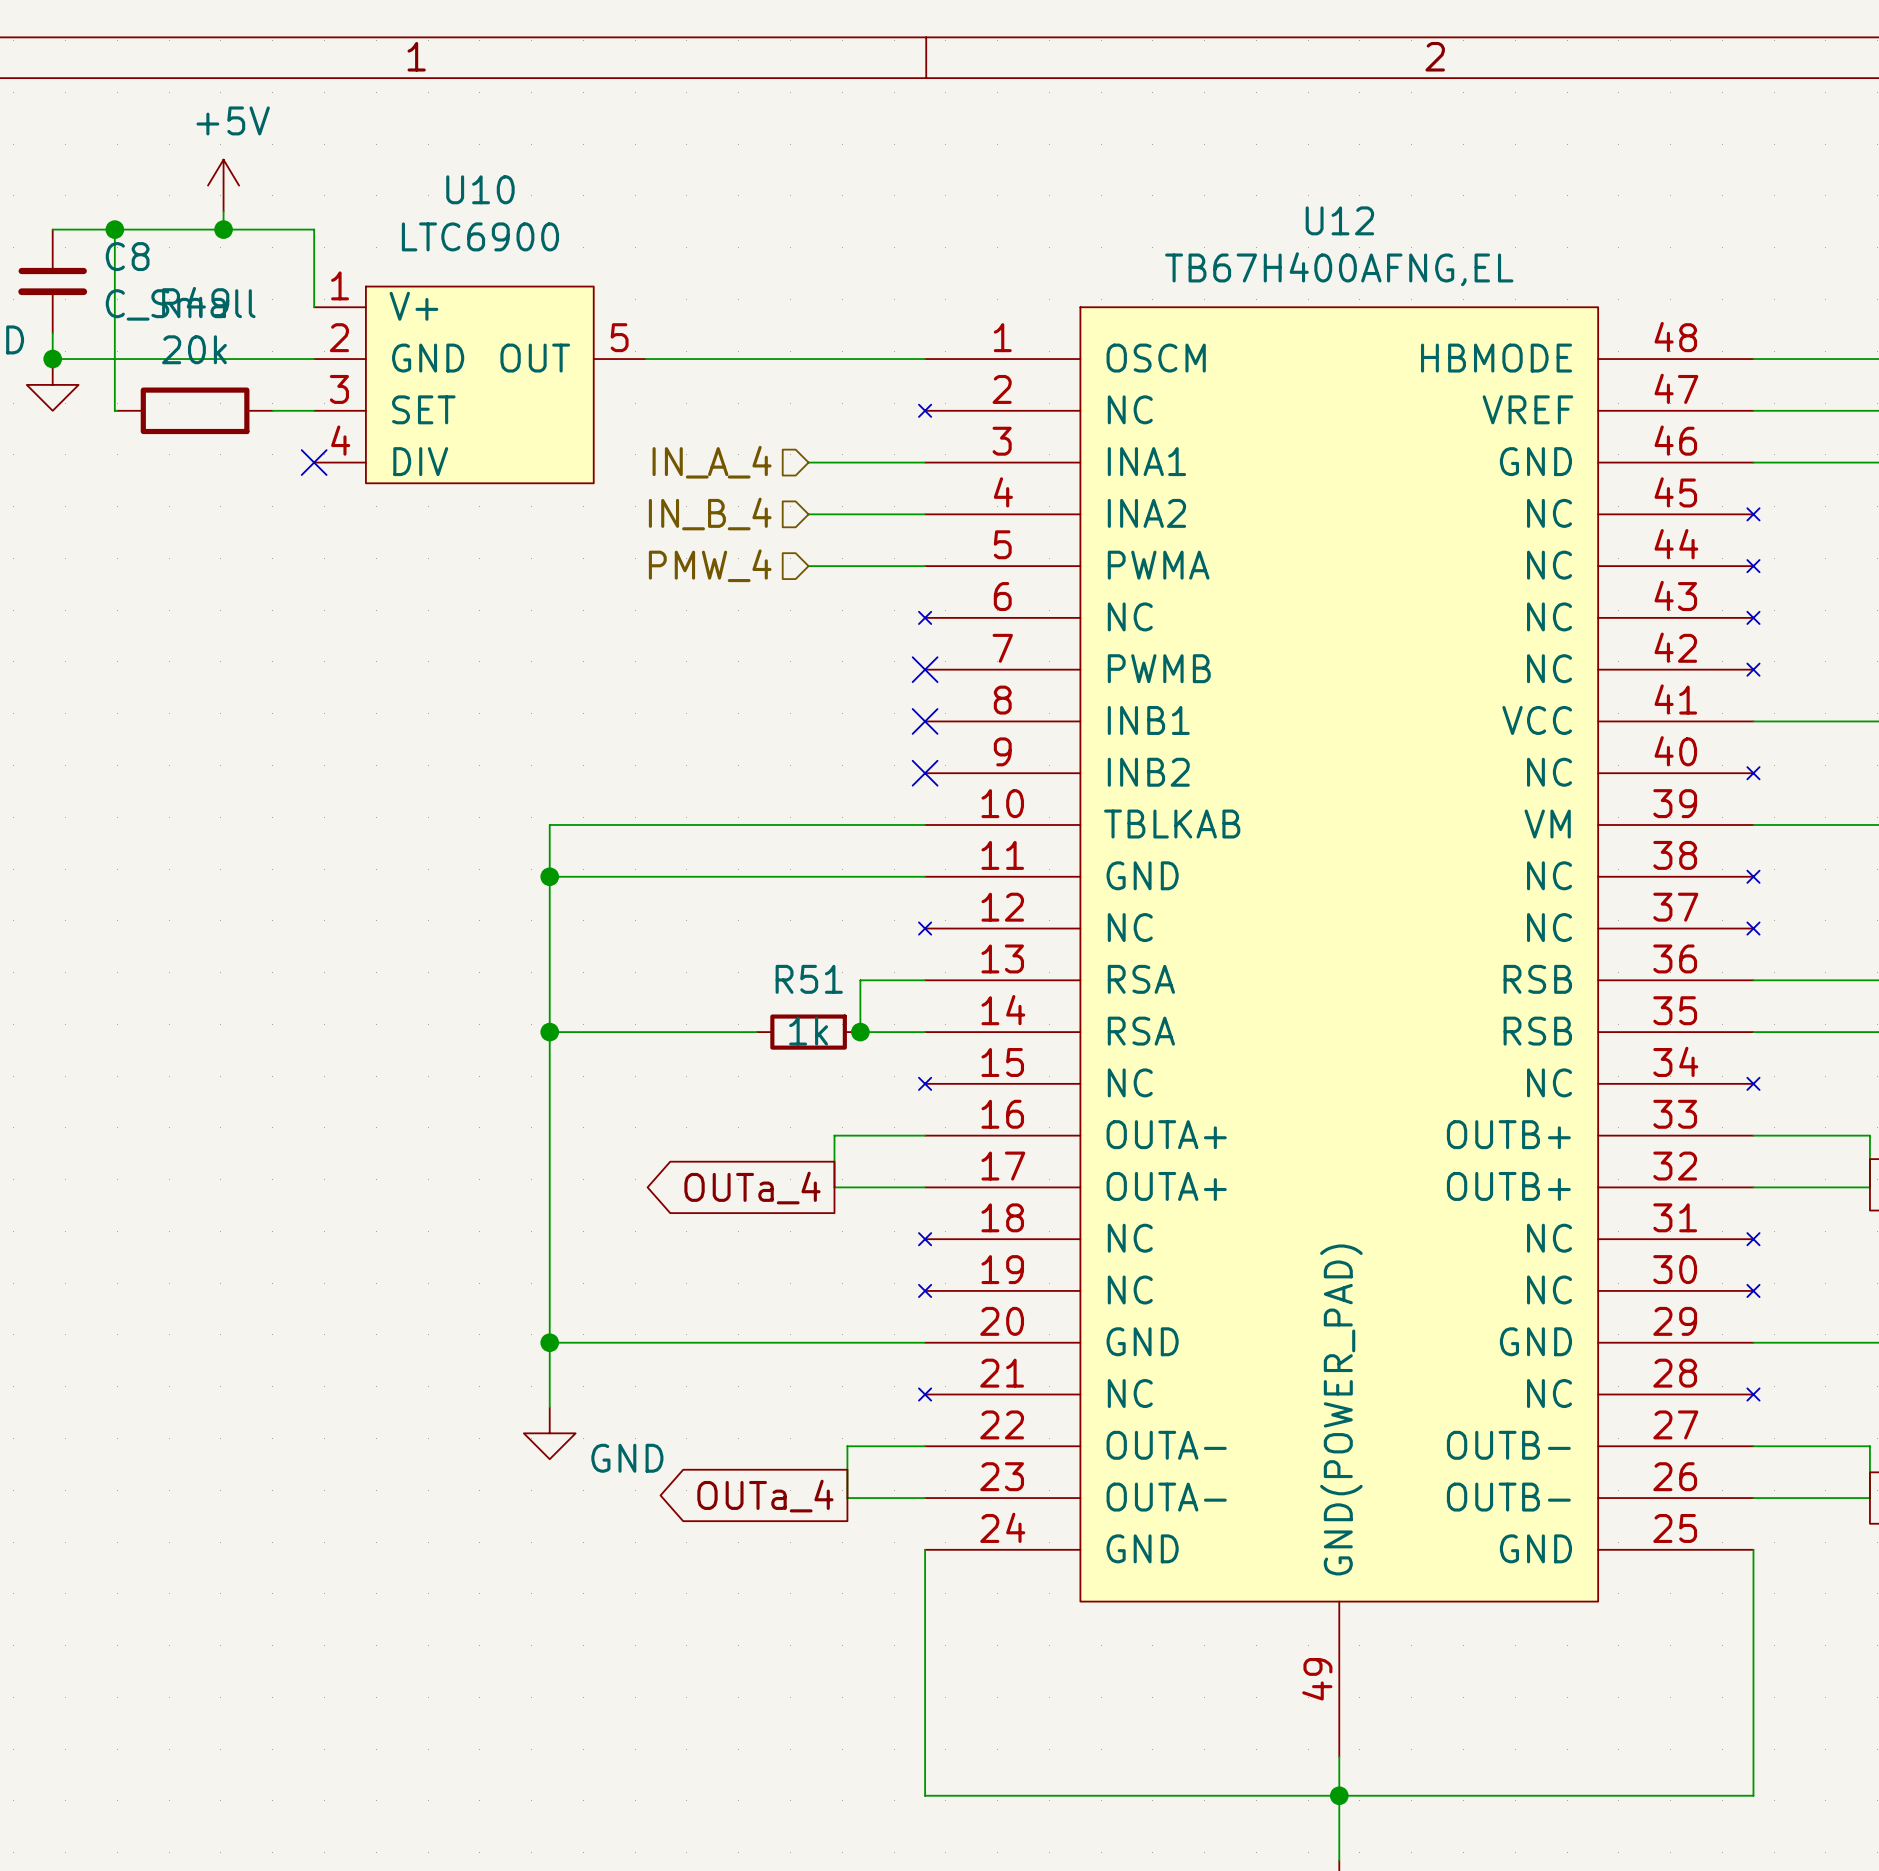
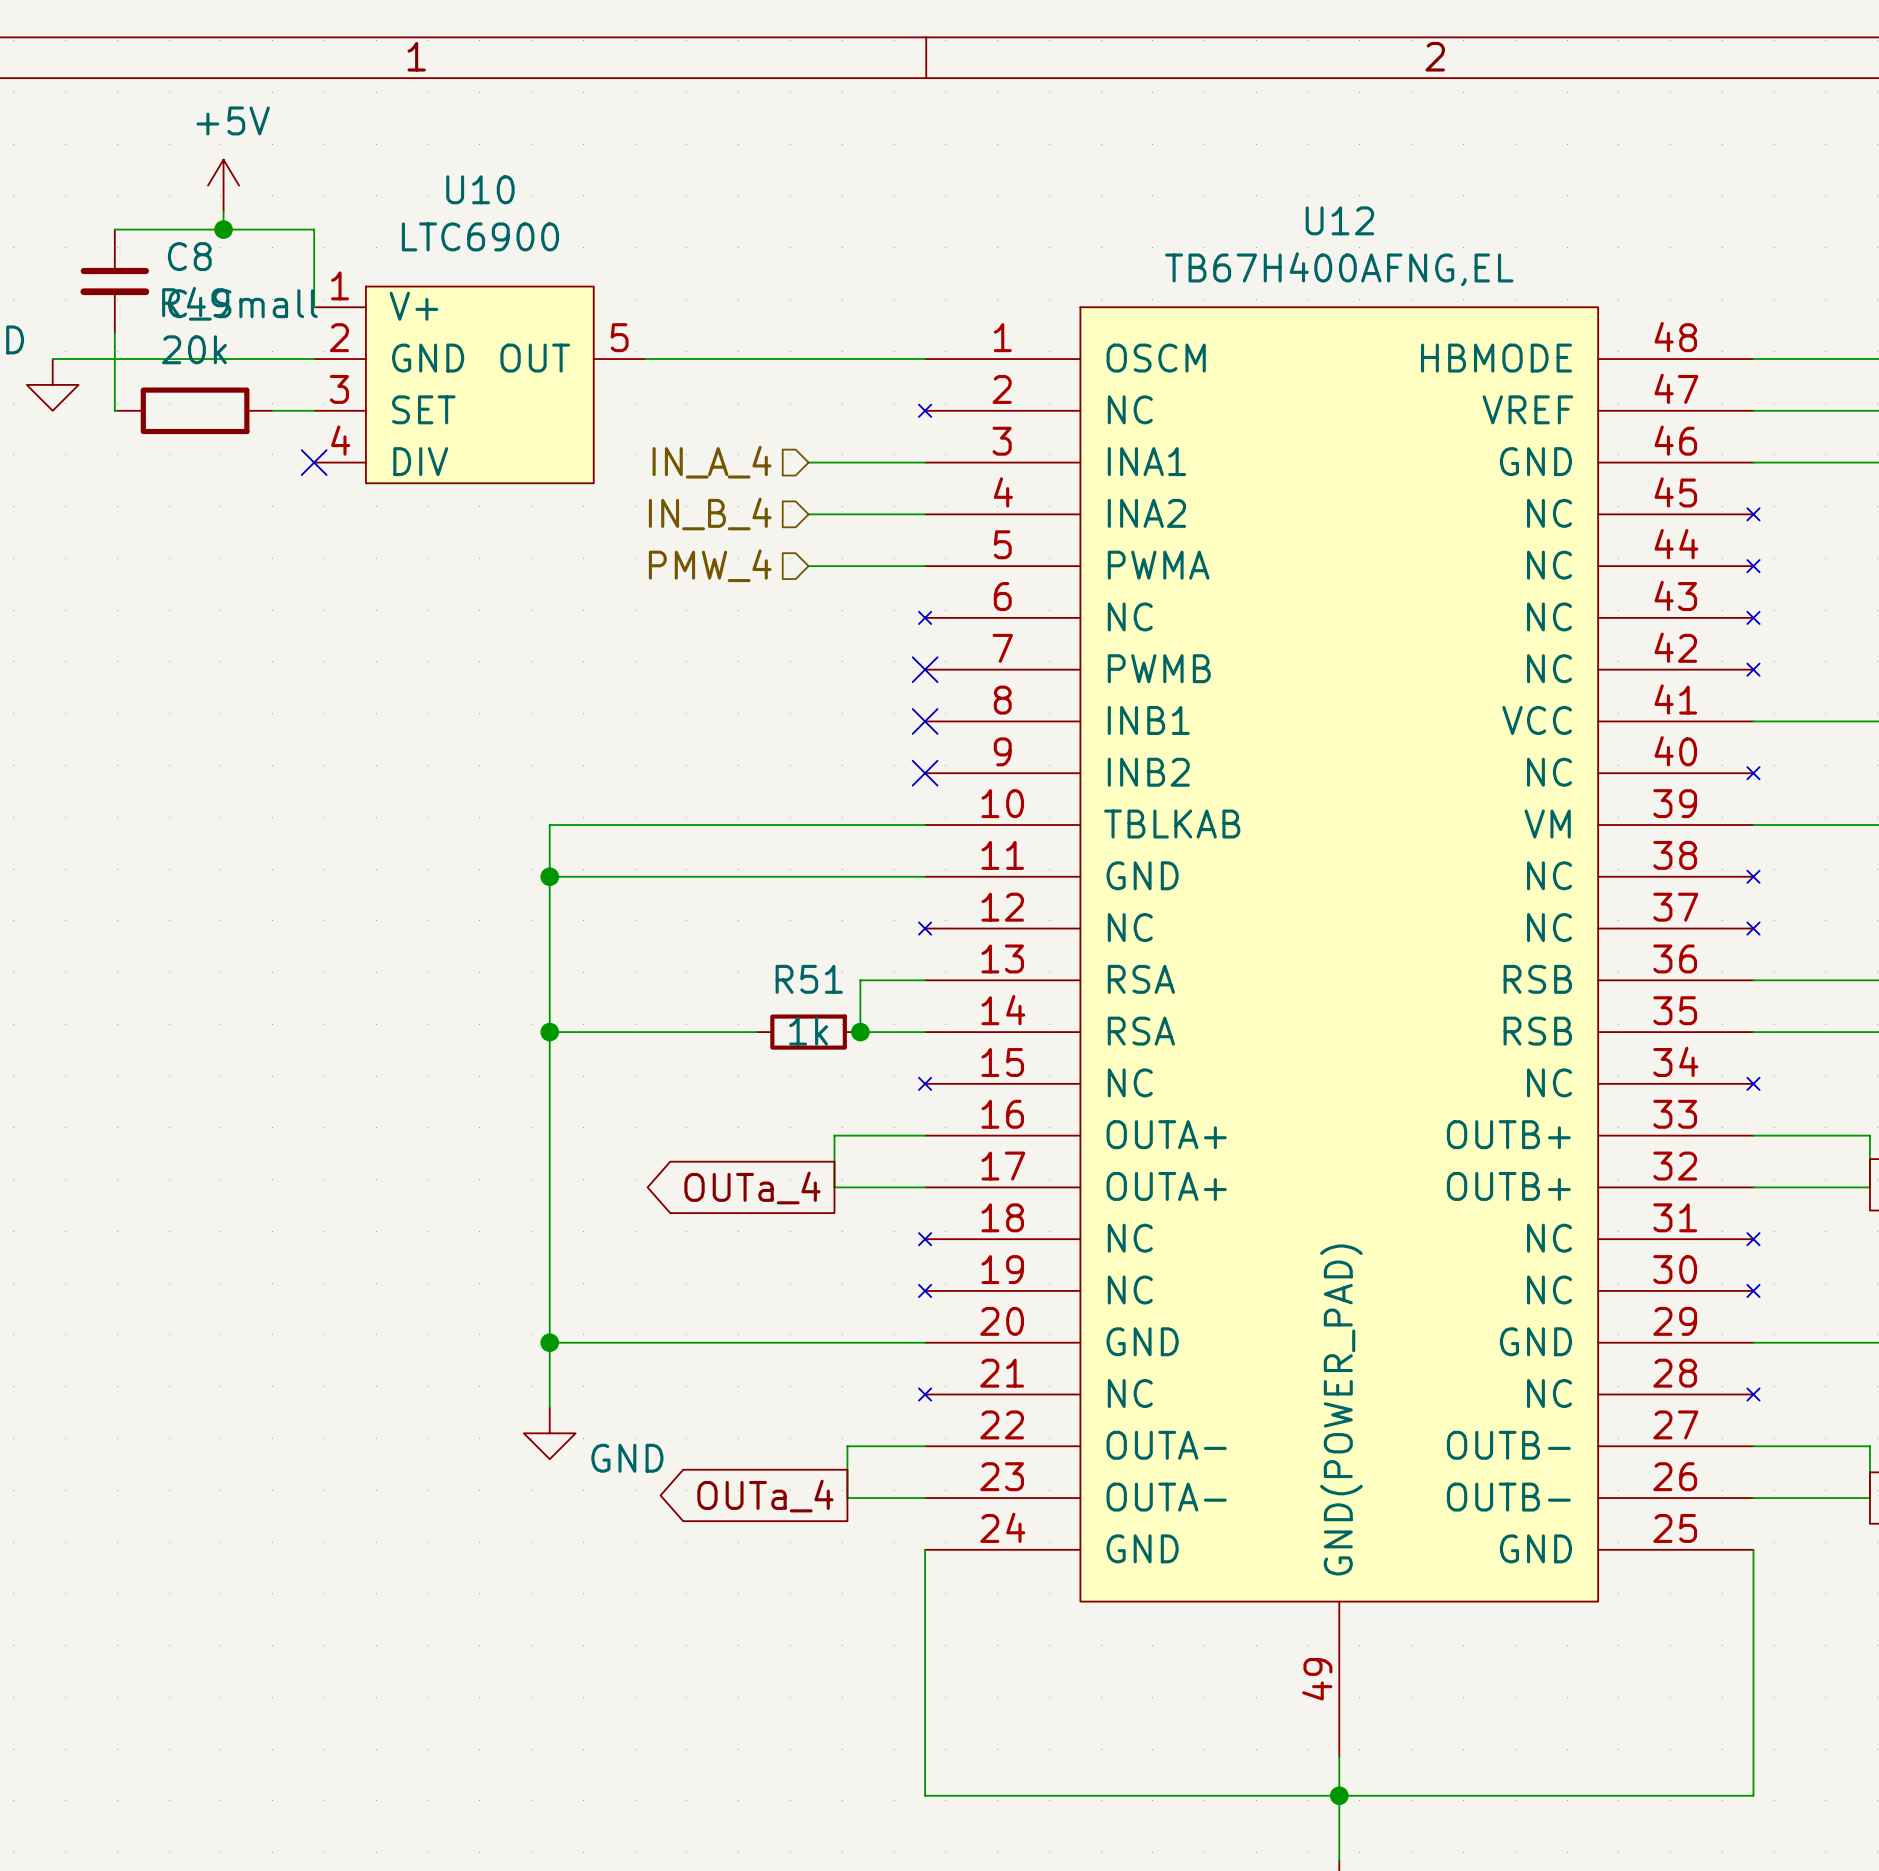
wire: (52, 229) (114, 229) (114, 333) -> none
junction: (114, 229) -> none
C8 position: (52, 281) -> (114, 281)
wire: (52, 333) (52, 359) -> none
junction: (52, 359) -> none

